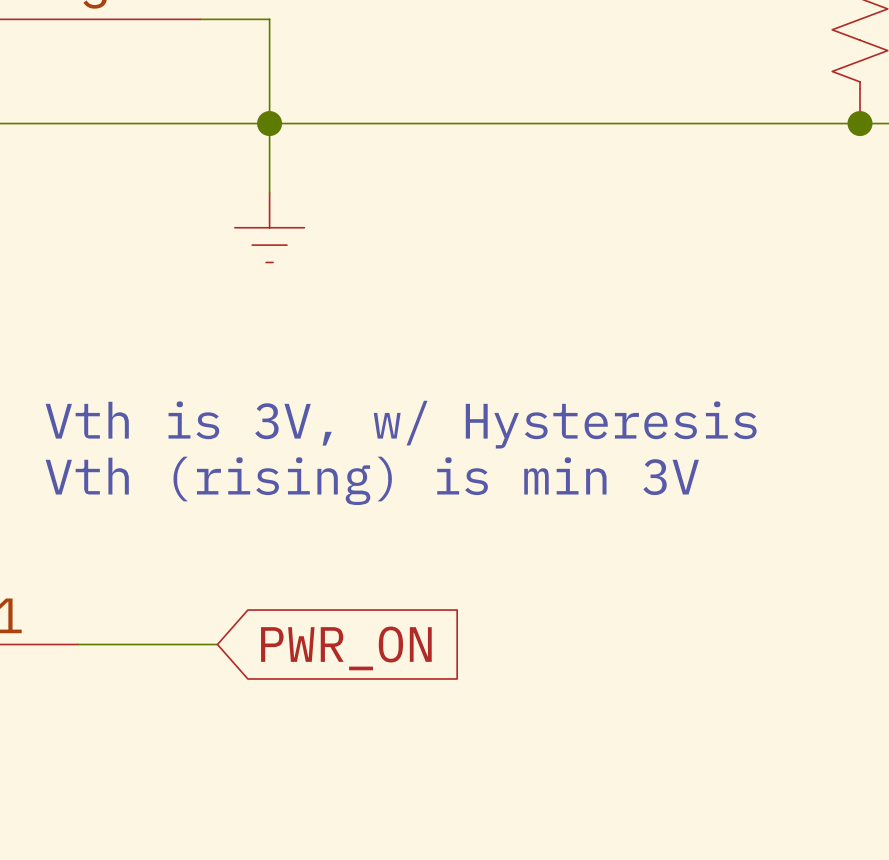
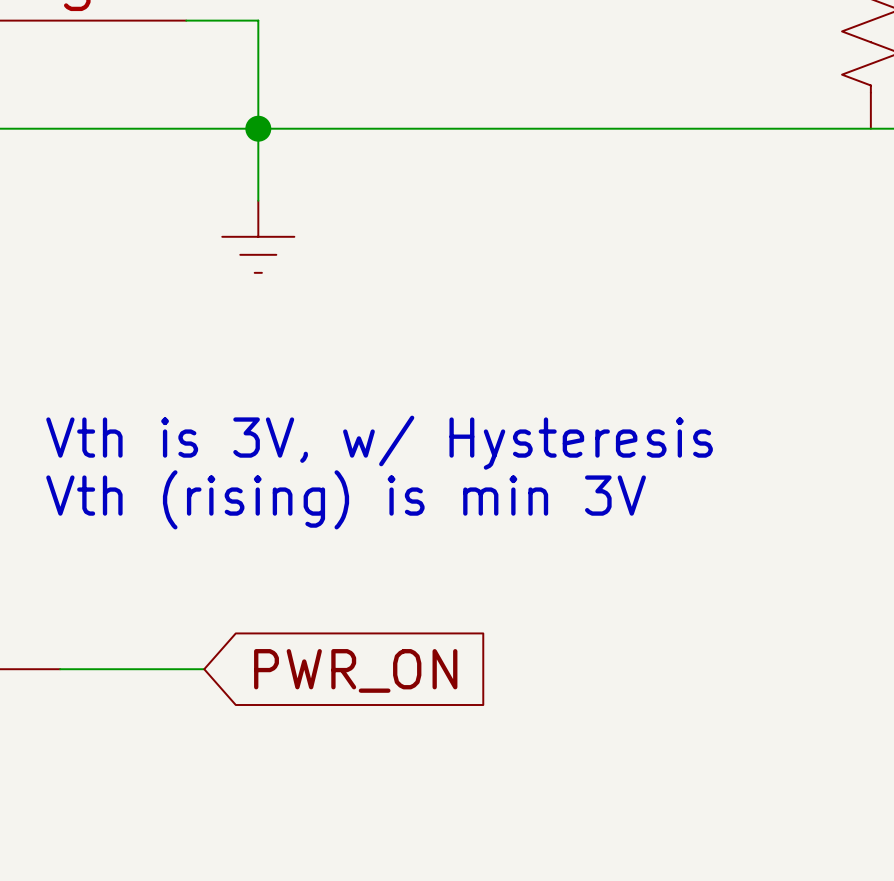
junction: (860, 123) -> none
text position: Vth is 3V, w/ Hysteresis (401, 424) -> Vth is 3V, w/ Hysteresis (379, 442)
text position: Vth (rising) is min 3V (372, 480) -> Vth (rising) is min 3V (346, 499)

